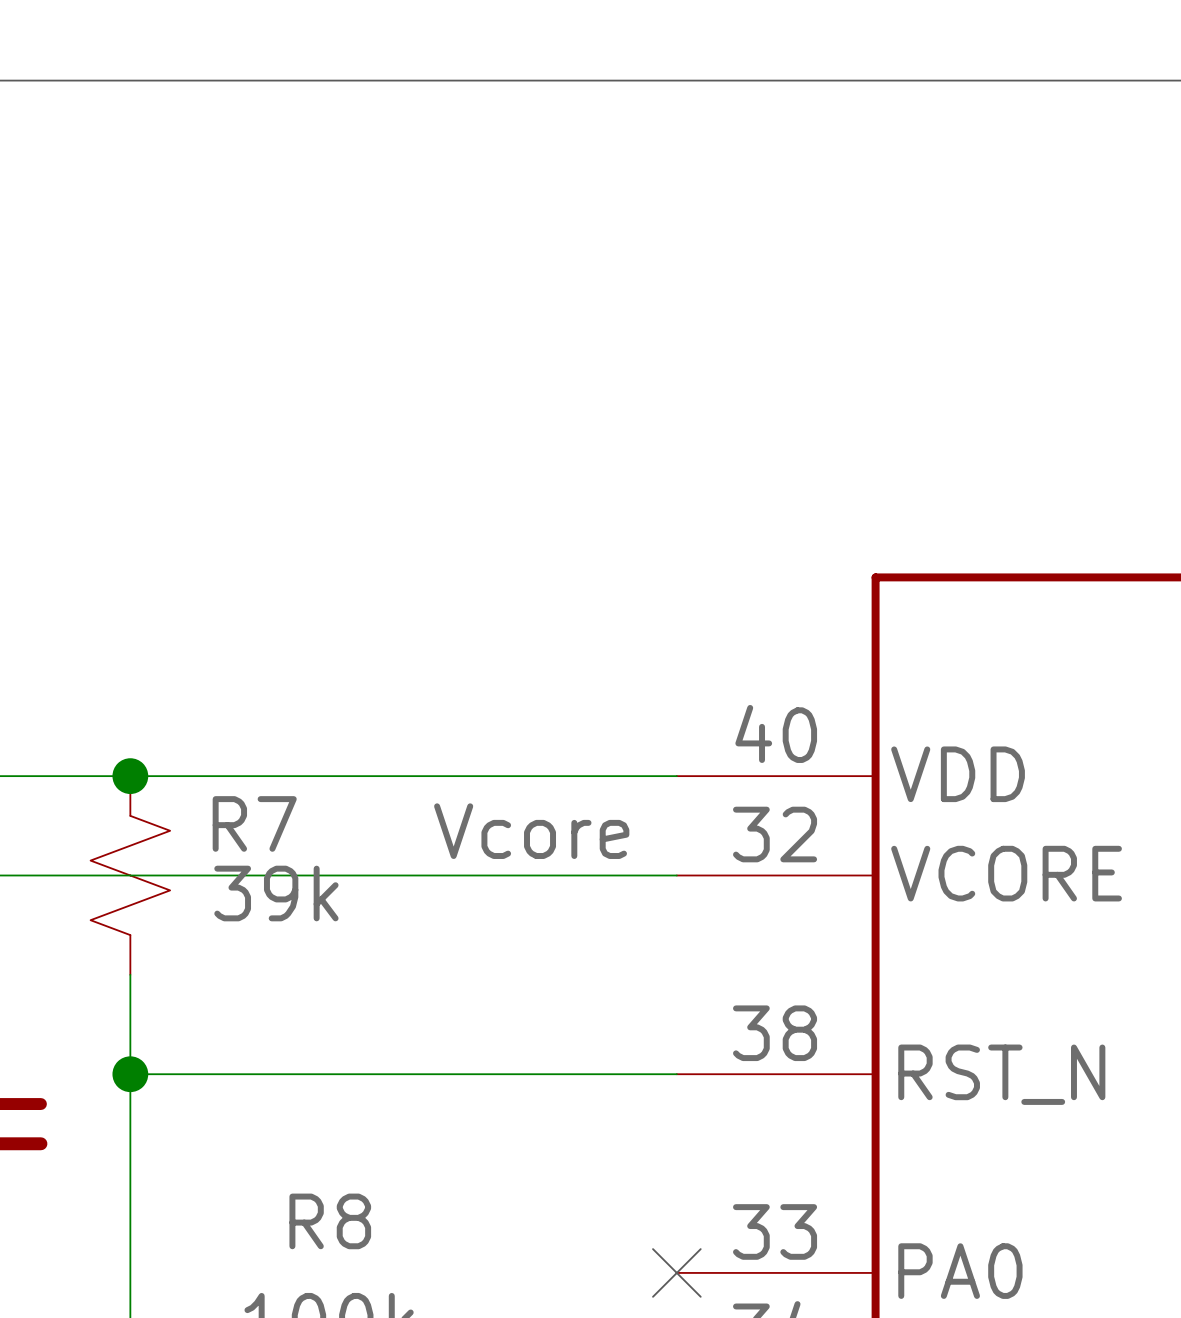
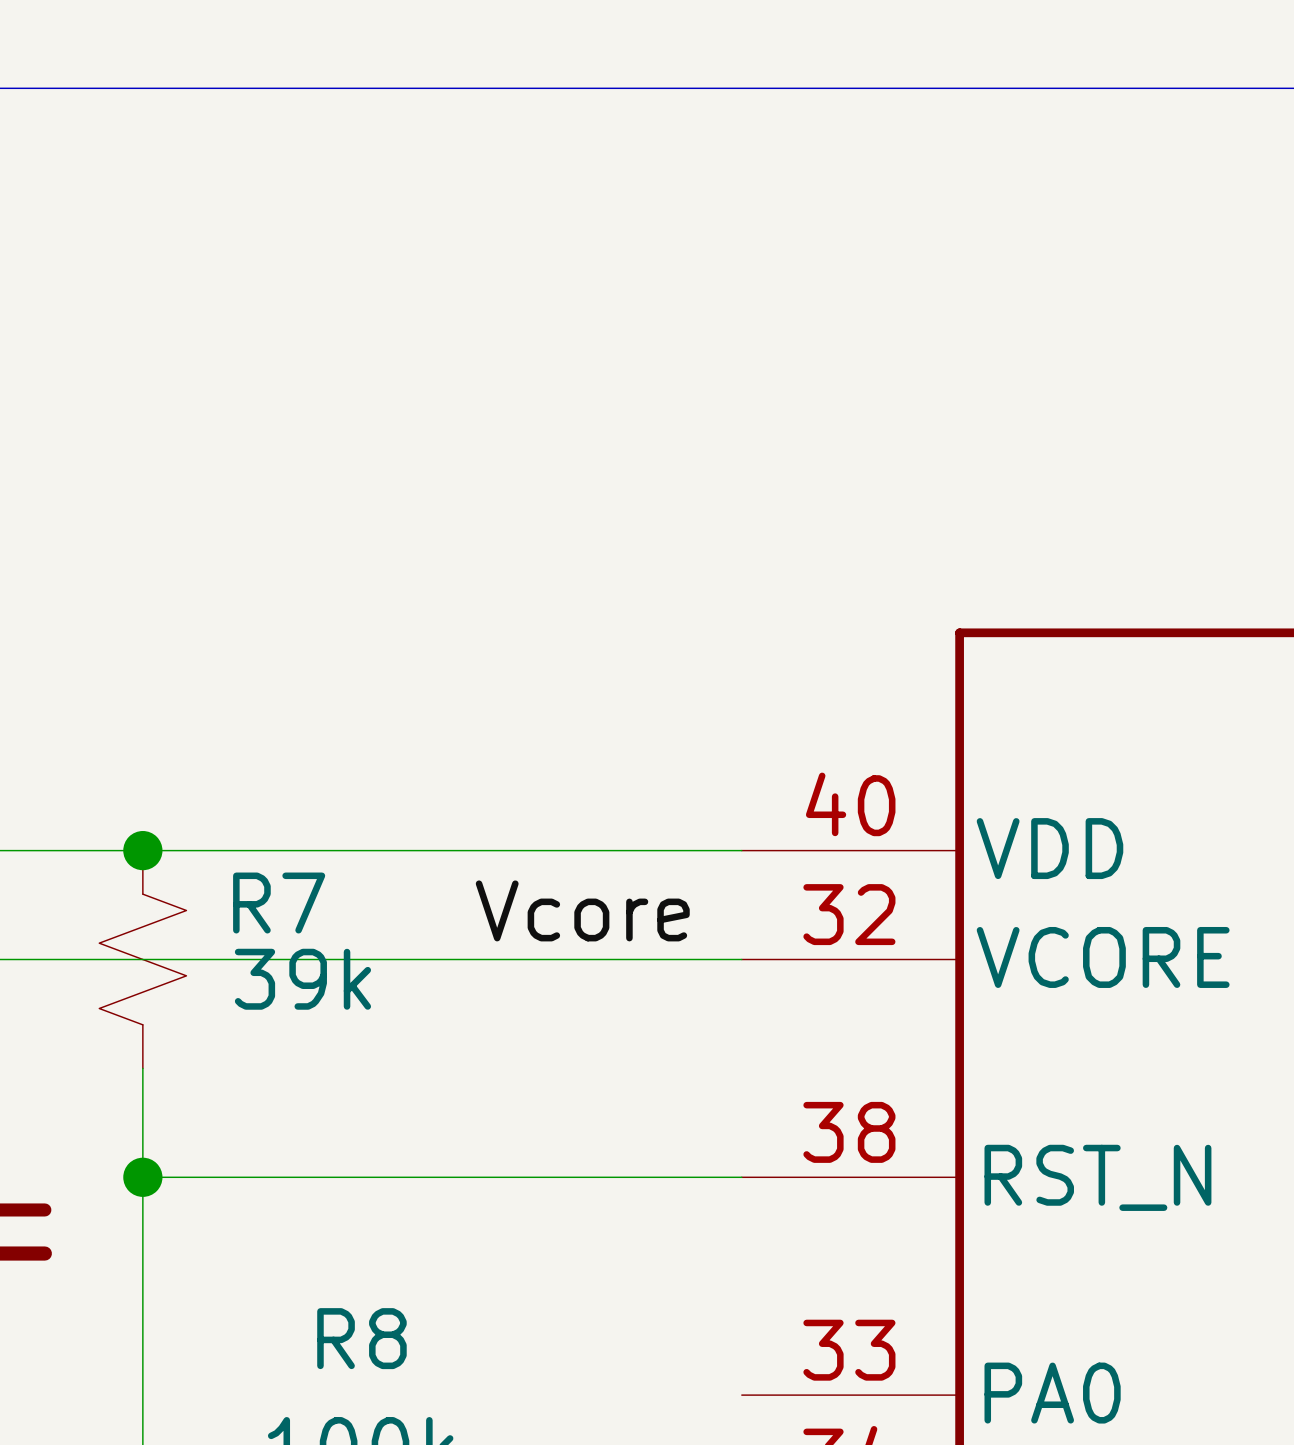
no-connect mark: (676, 1272) -> none

